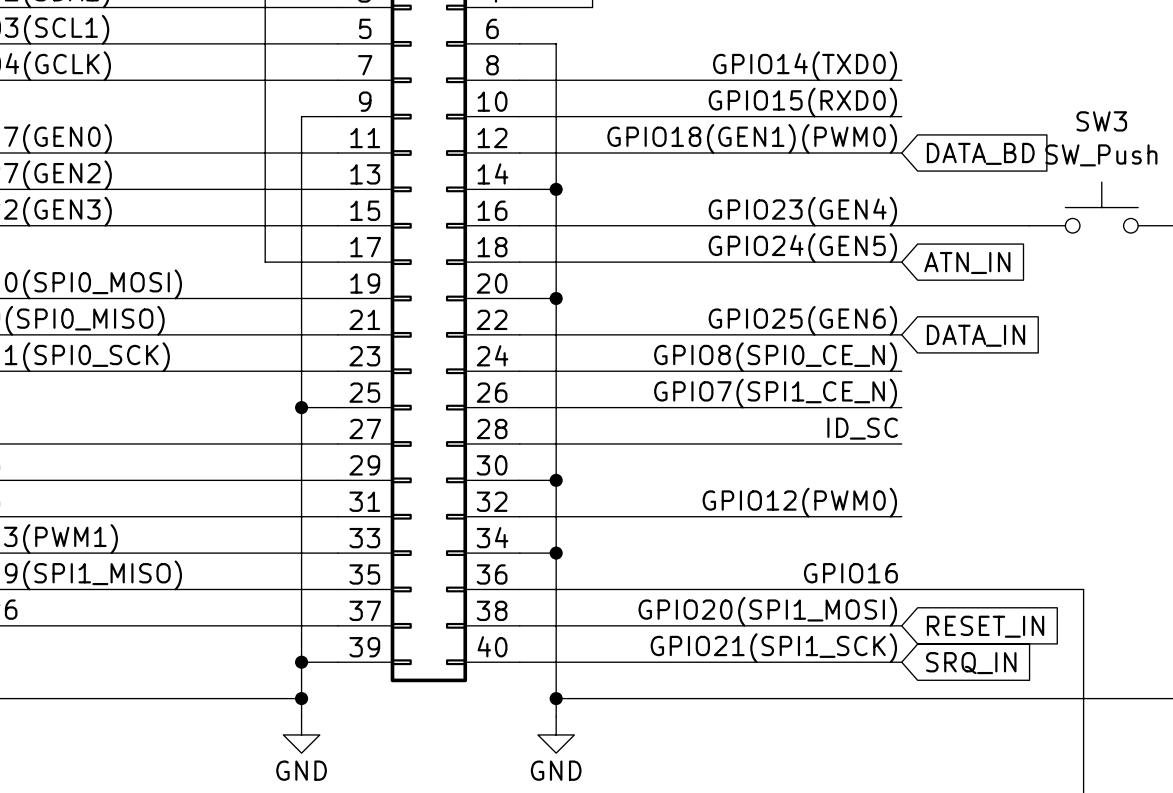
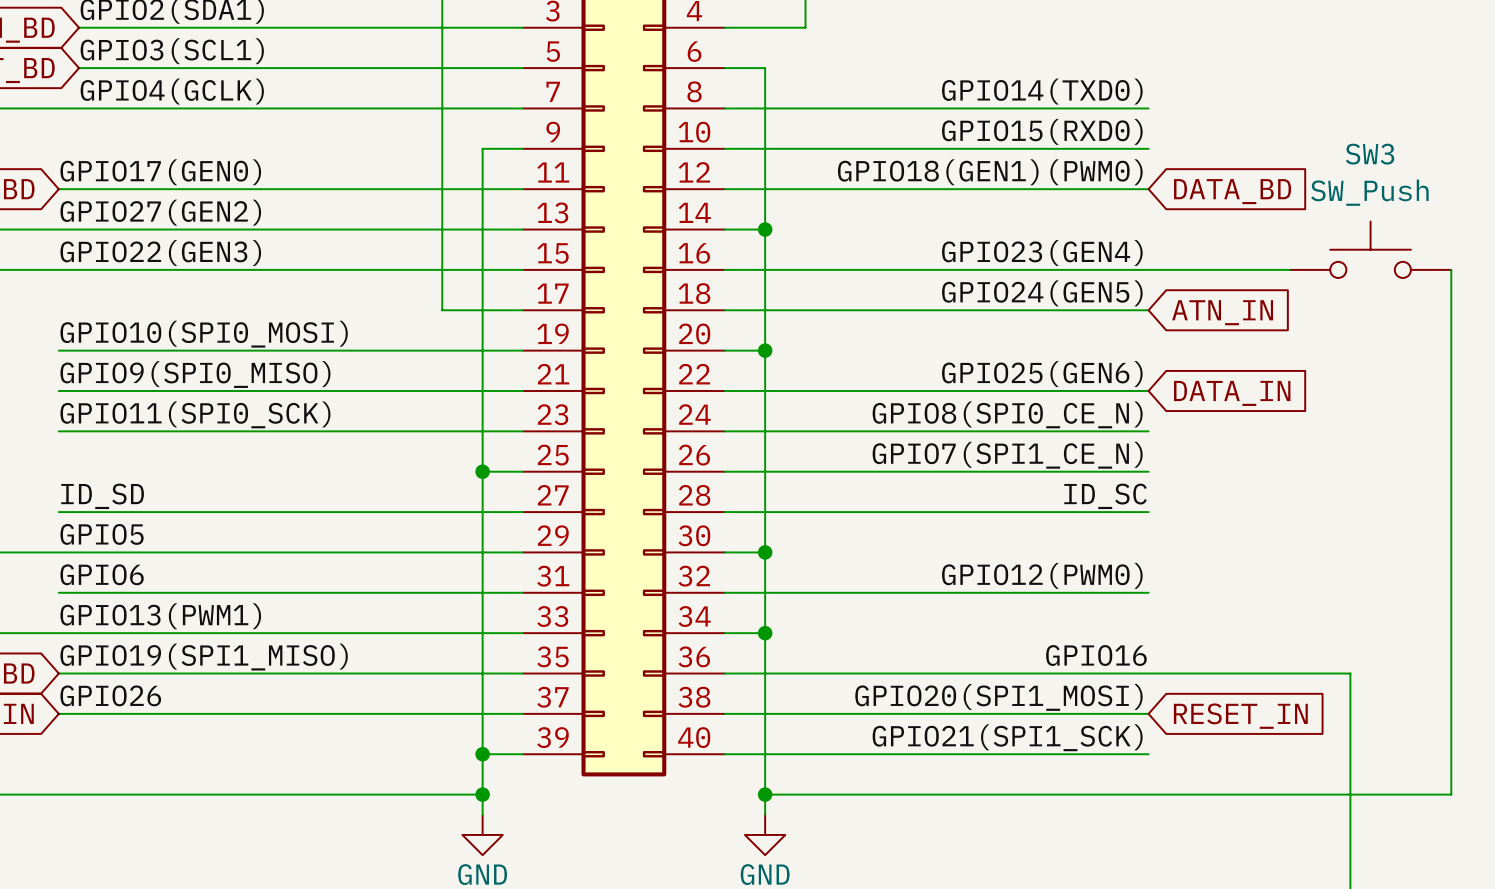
global label: SRQ_IN (971, 663) -> none

